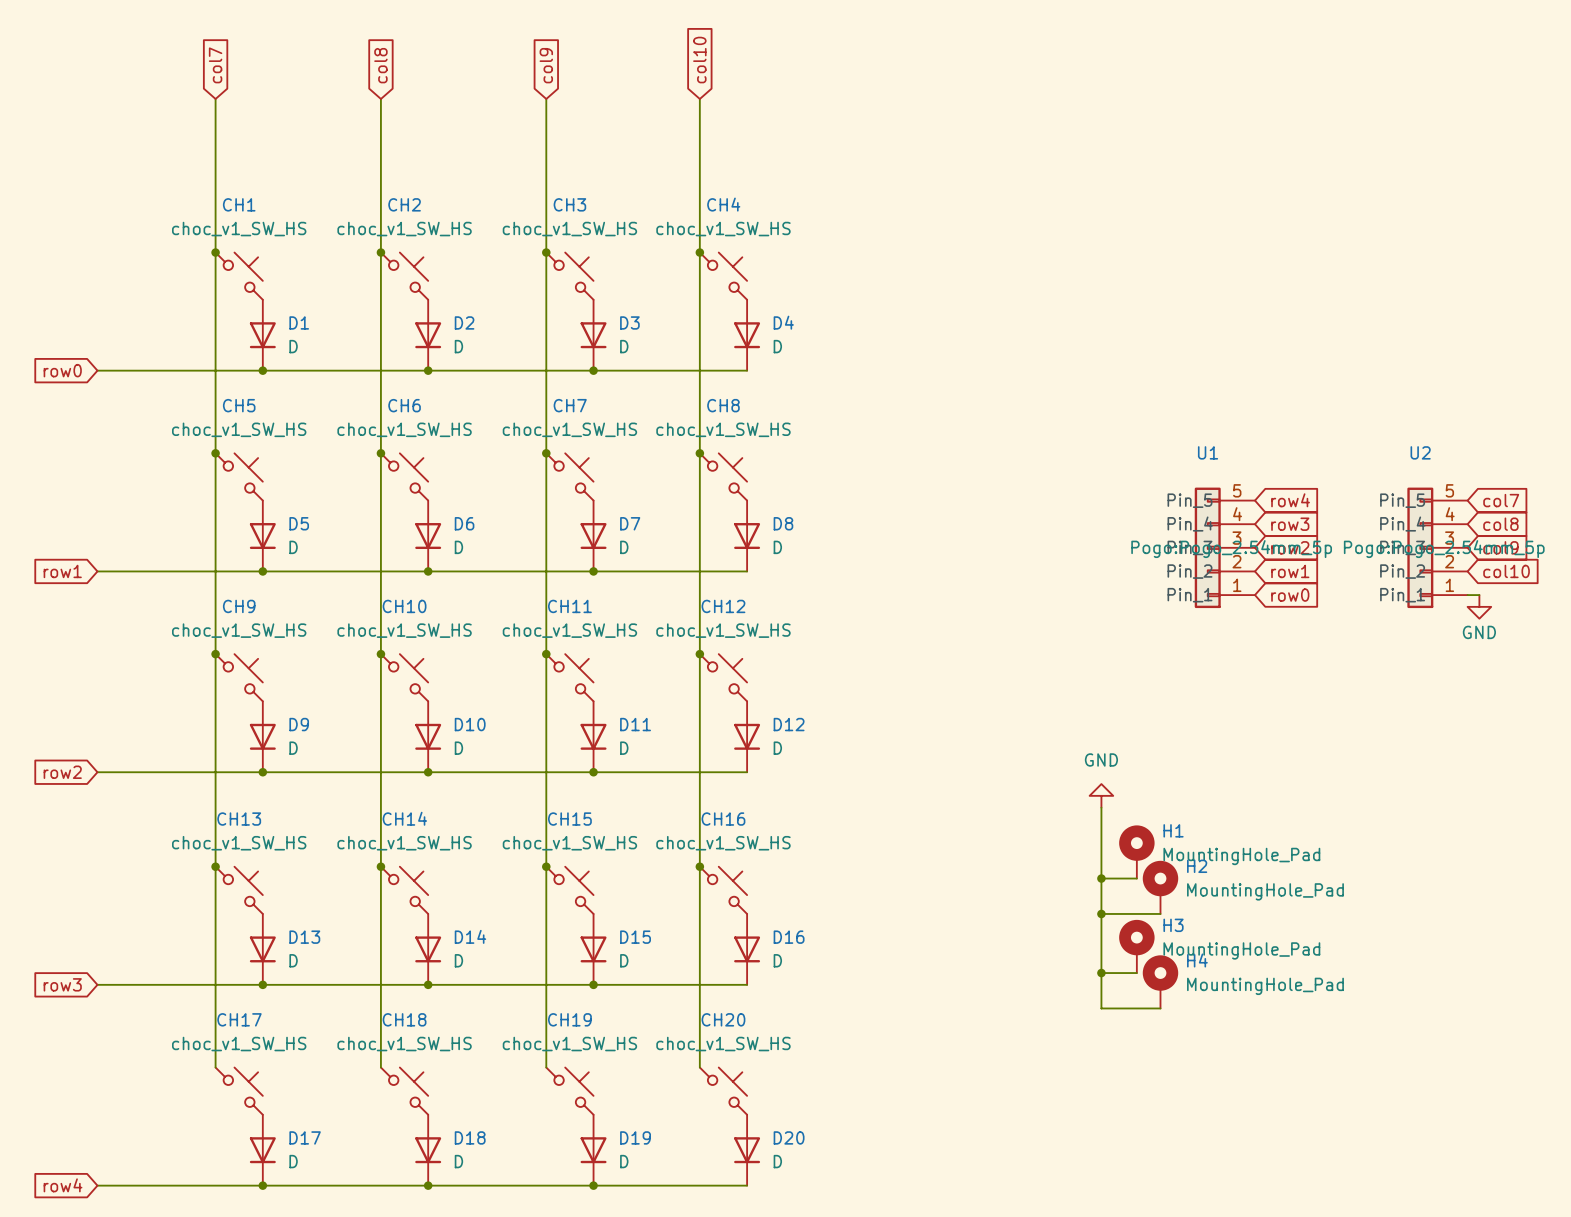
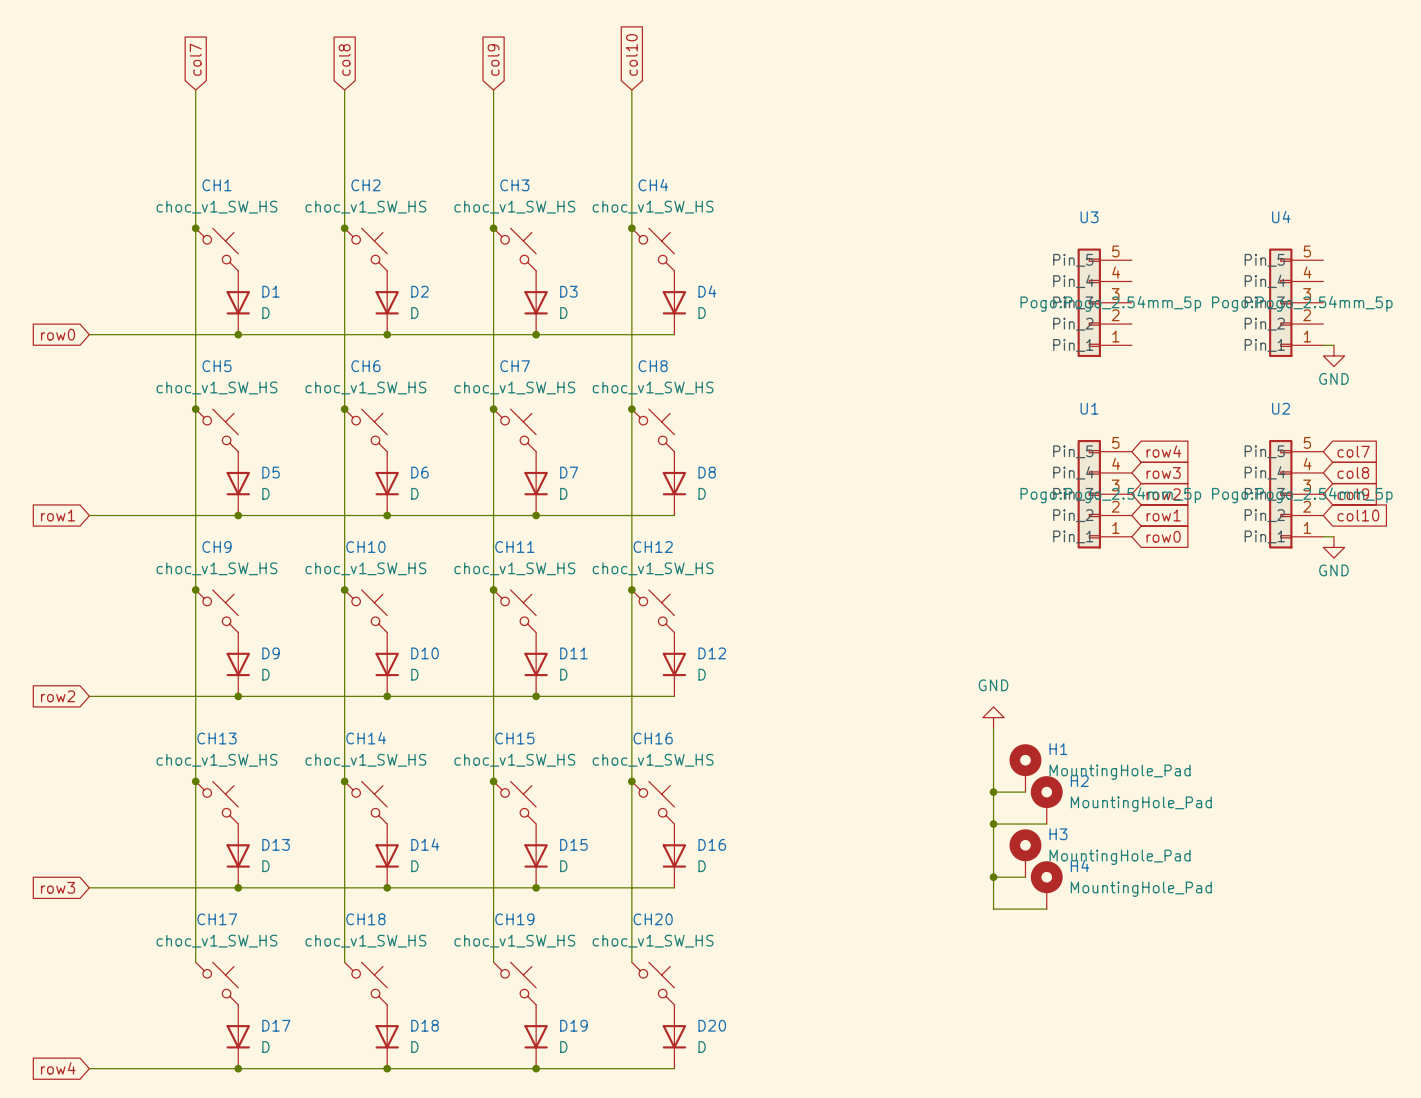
U3: none -> (1104, 302)
U4: none -> (1296, 302)
wire: none -> (1323, 345) (1333, 345)
power symbol: none -> GND (1333, 355)

